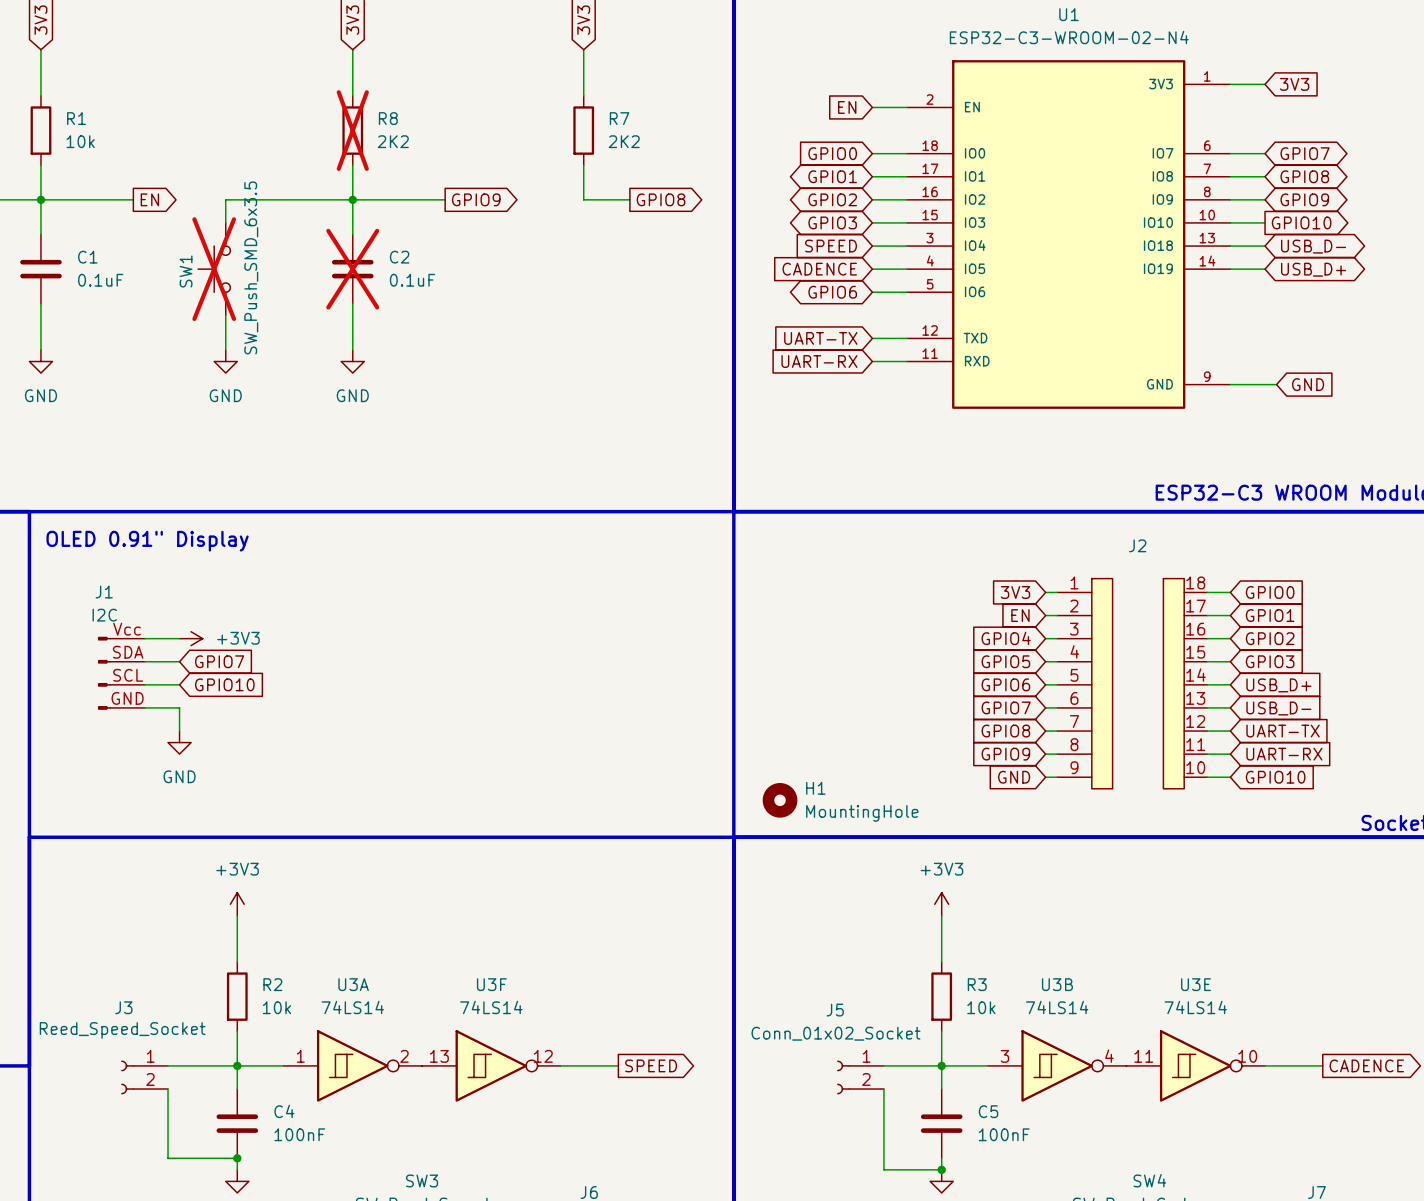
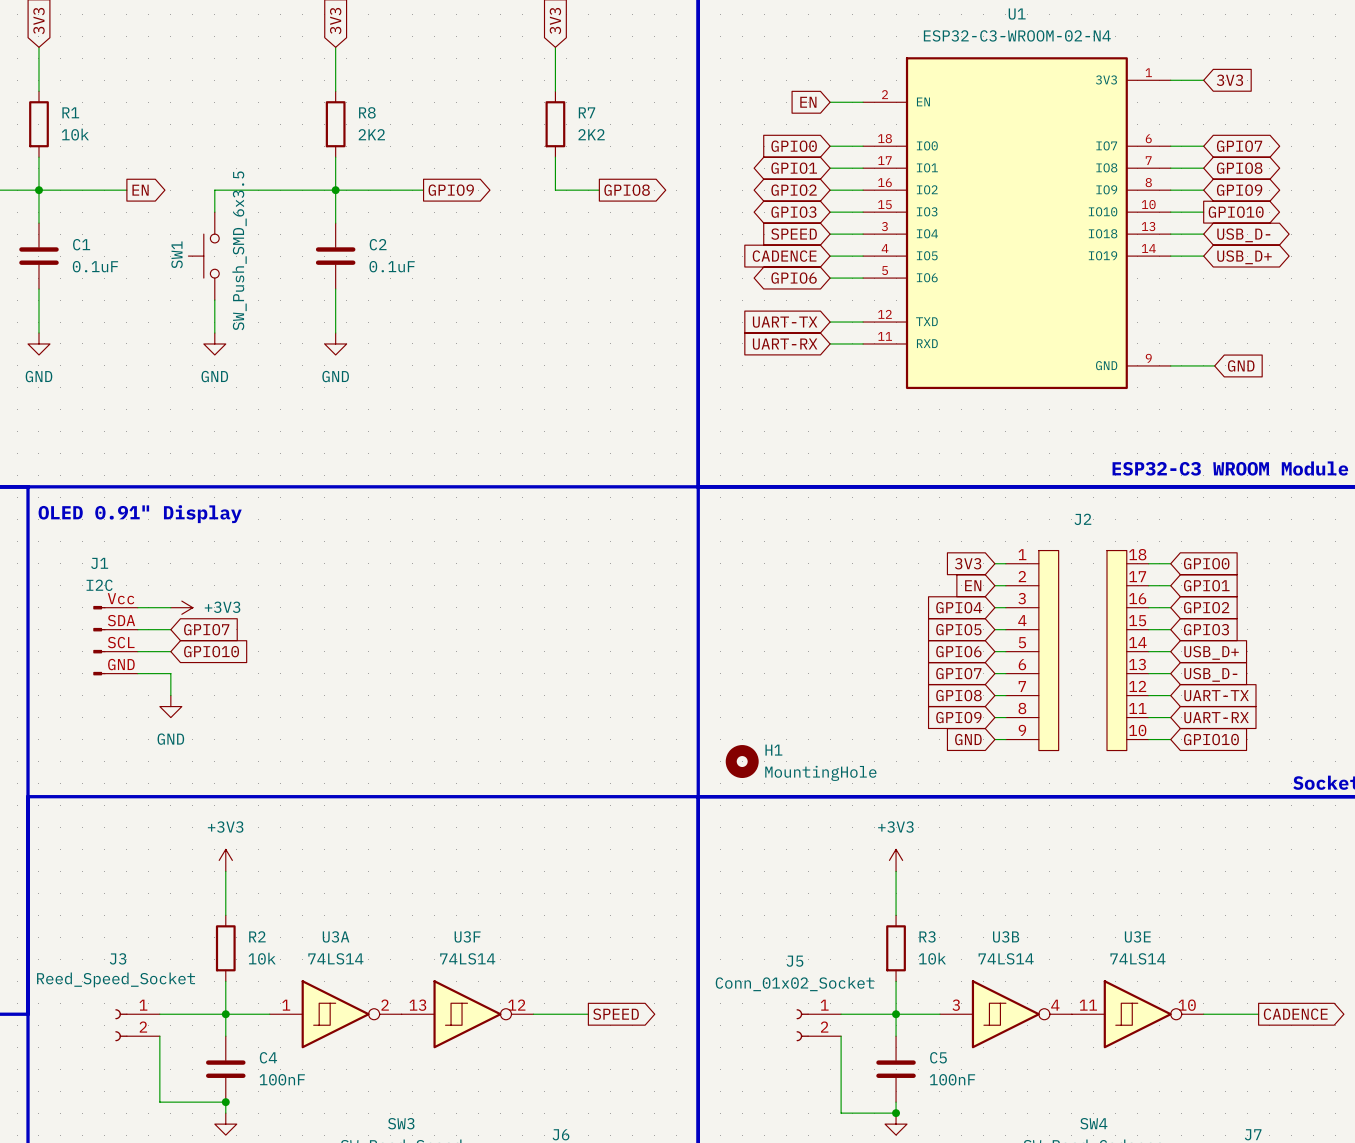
R8 do-not-place cross: (352, 130) -> none
SW1 do-not-place cross: (214, 269) -> none
C2 do-not-place cross: (352, 269) -> none

